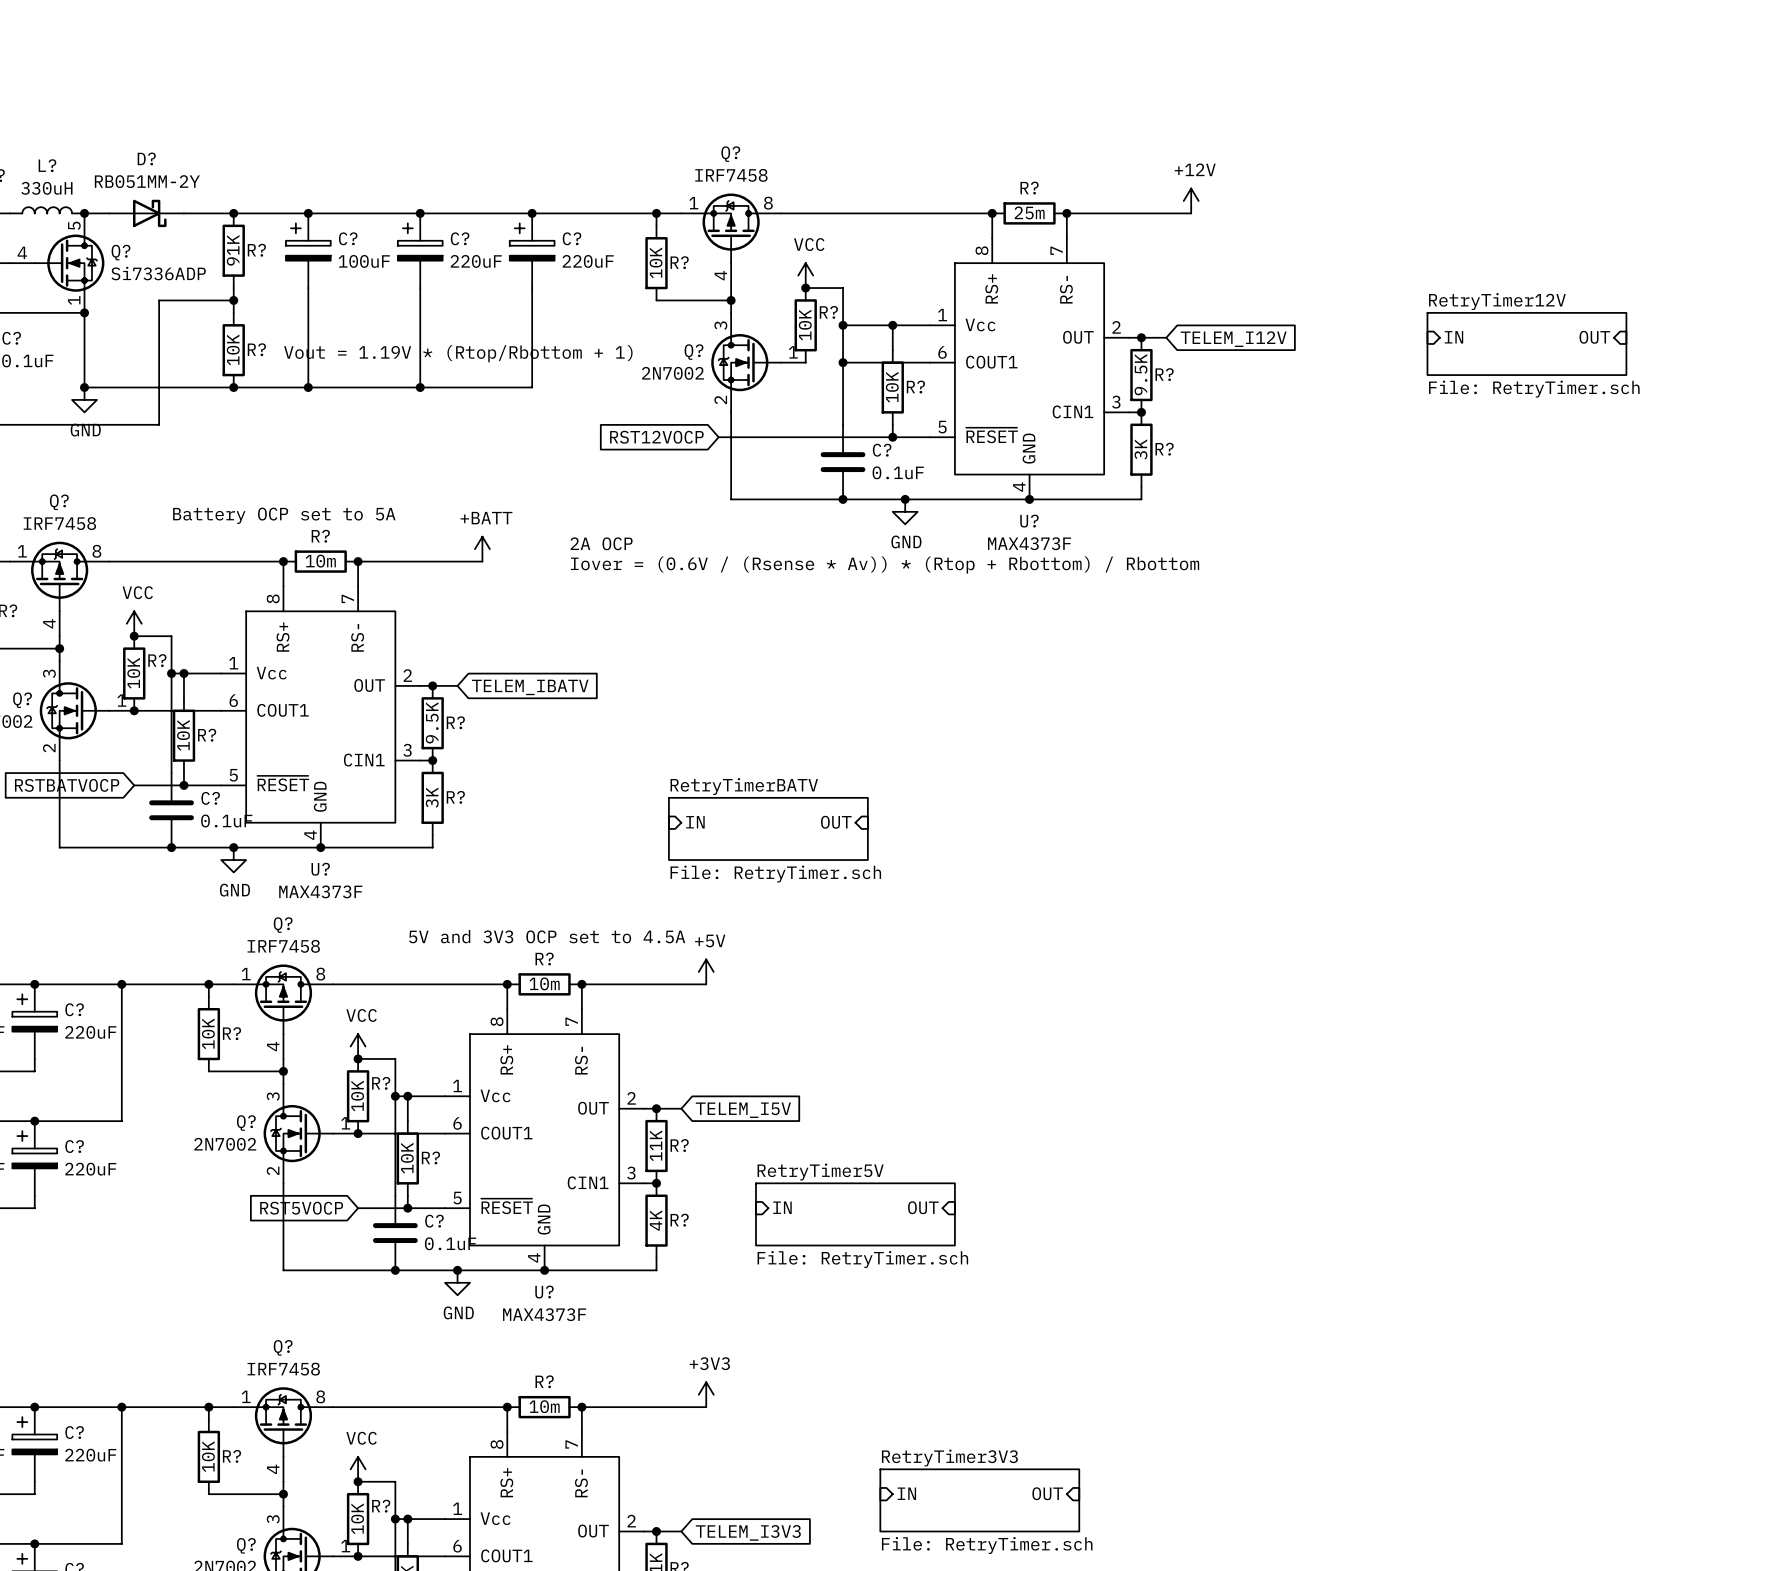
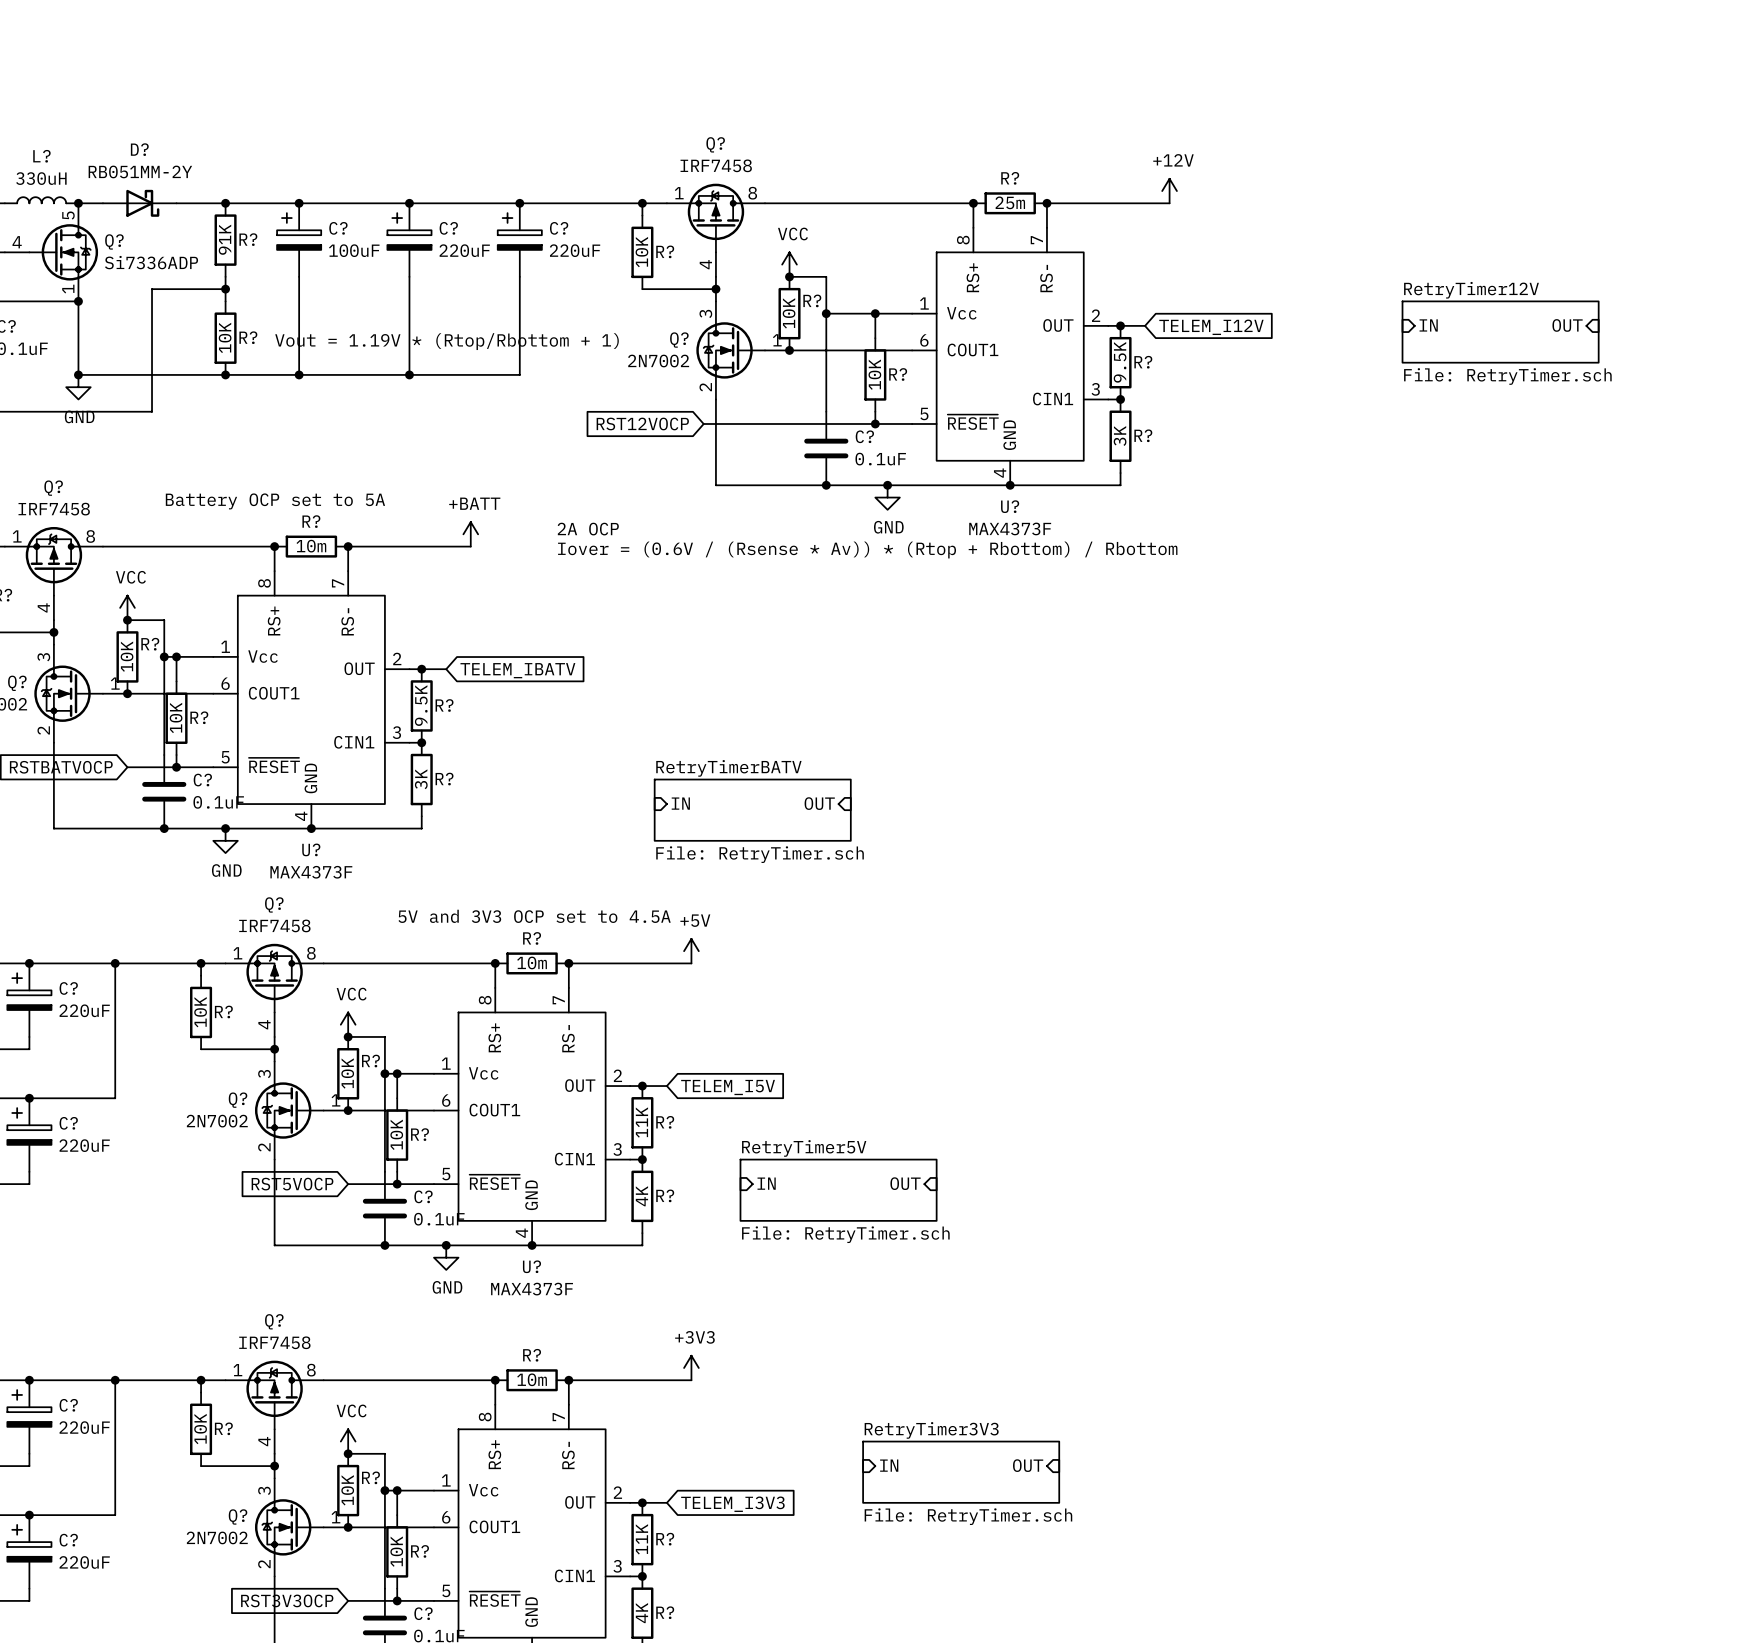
wire: none -> (789, 350) (826, 350)
junction position: (843, 362) -> (789, 350)

